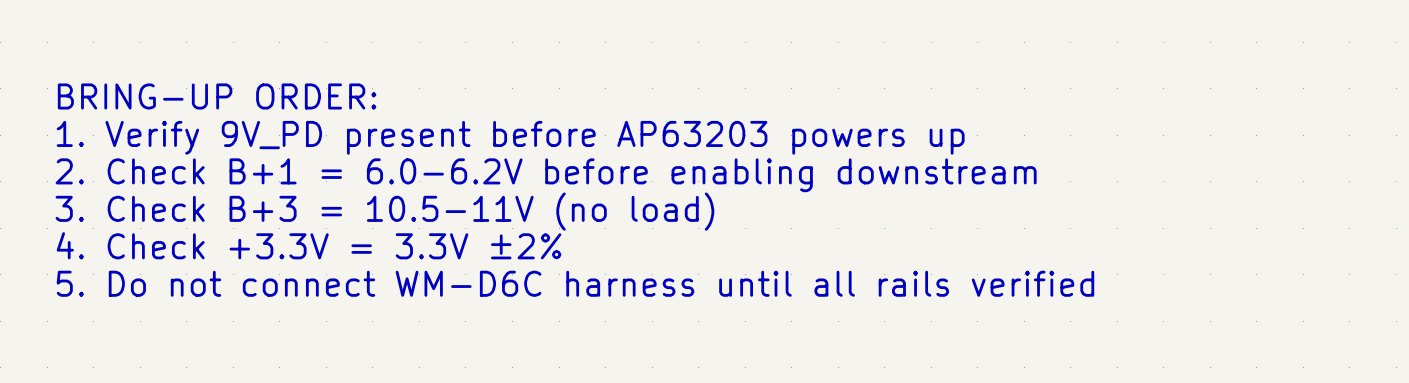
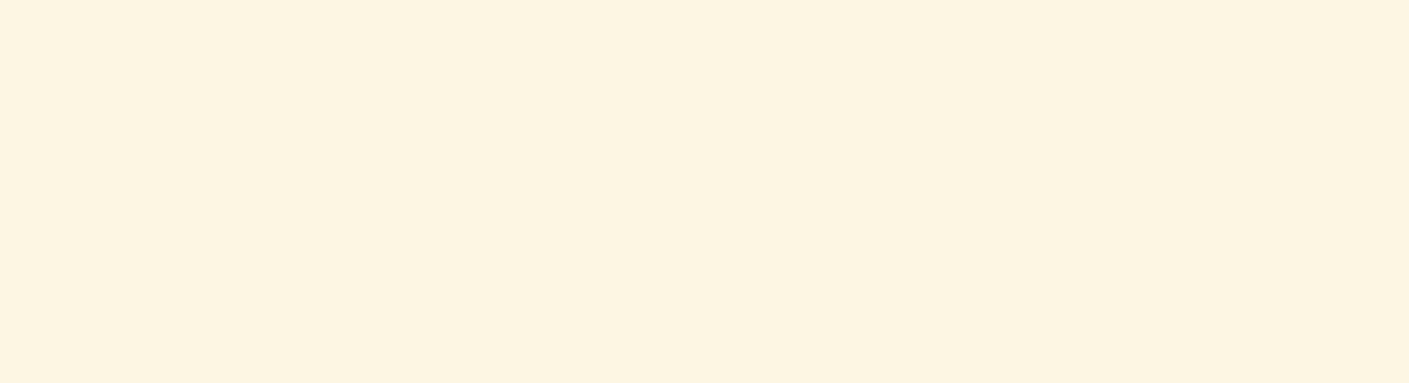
text: BRING-UP ORDER: (217, 96) -> none
text: 1. Verify 9V_PD present before AP63203 powers up (510, 137) -> none
text: 2. Check B+1 = 6.0-6.2V before enabling downstream (546, 175) -> none
text: 3. Check B+3 = 10.5-11V (no load) (384, 211) -> none
text: 4. Check +3.3V = 3.3V ±2% (309, 245) -> none
text: 5. Do not connect WM-D6C harness until all rails verified (575, 283) -> none

